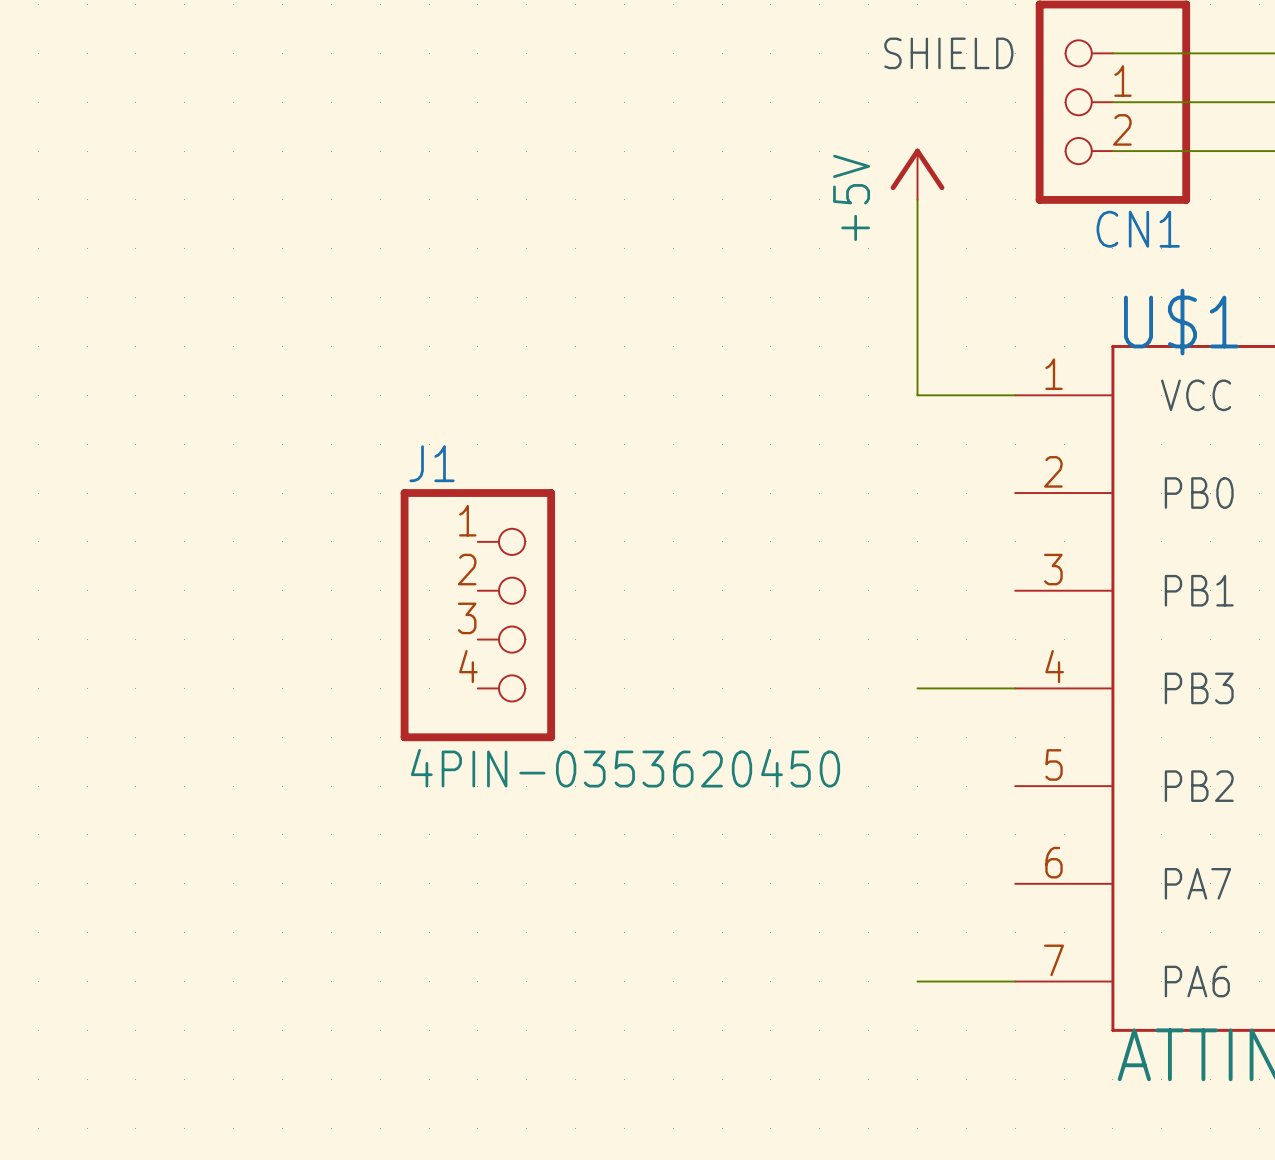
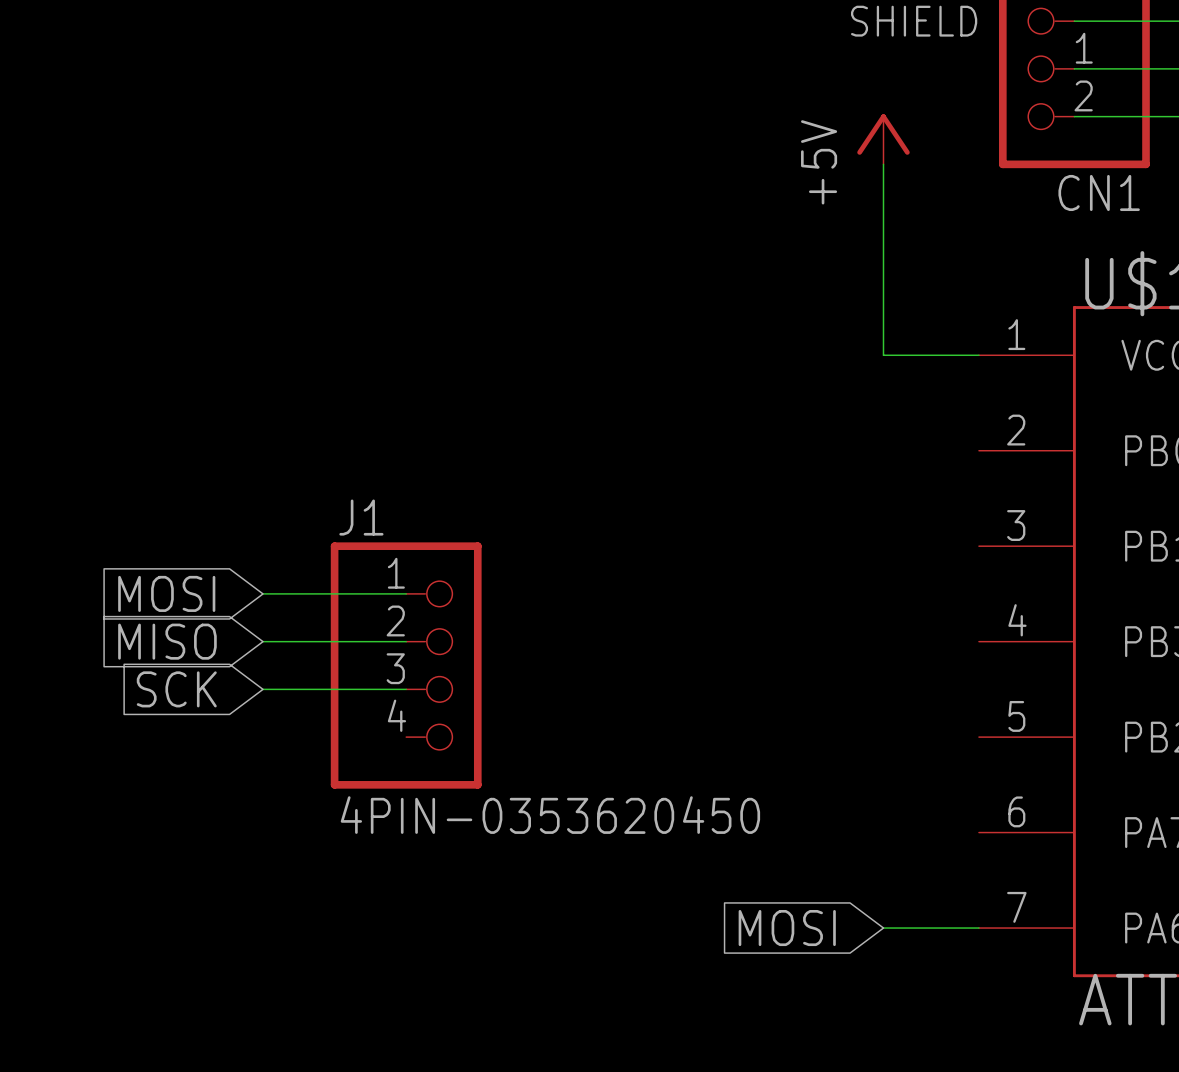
J1 position: (477, 615) -> (406, 665)
global label: none -> MOSI (166, 593)
wire: none -> (263, 593) (406, 593)
global label: none -> MISO (167, 641)
wire: none -> (263, 641) (406, 641)
wire: (917, 688) (1015, 688) -> none
global label: none -> SCK (176, 689)
wire: none -> (263, 689) (406, 689)
global label: none -> MOSI (787, 928)

